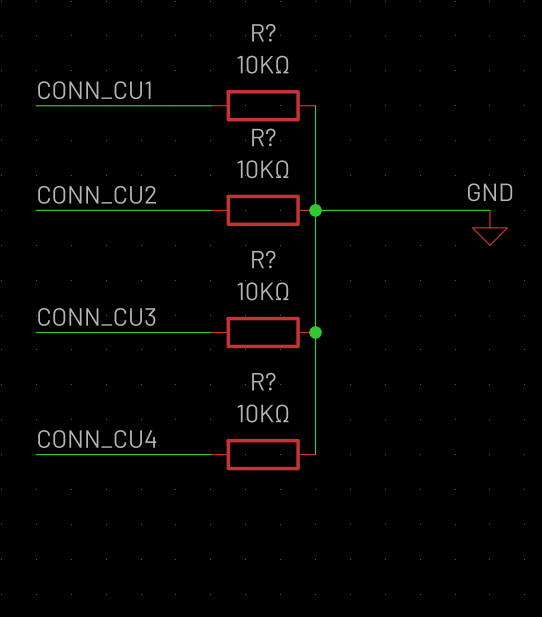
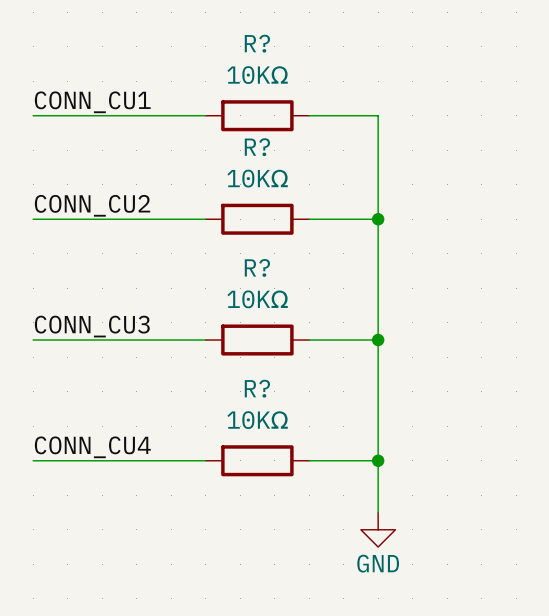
wire: (315, 105) (315, 454) -> (309, 115) (378, 115) (378, 512)
power symbol text position: GND (490, 192) -> GND (378, 563)
junction position: (315, 210) -> (378, 219)
wire: (385, 210) (489, 210) -> none
power symbol position: GND (489, 227) -> GND (378, 529)
wire: none -> (309, 340) (378, 340)
junction position: (315, 332) -> (378, 340)
wire: none -> (309, 460) (378, 460)
junction: none -> (378, 460)

